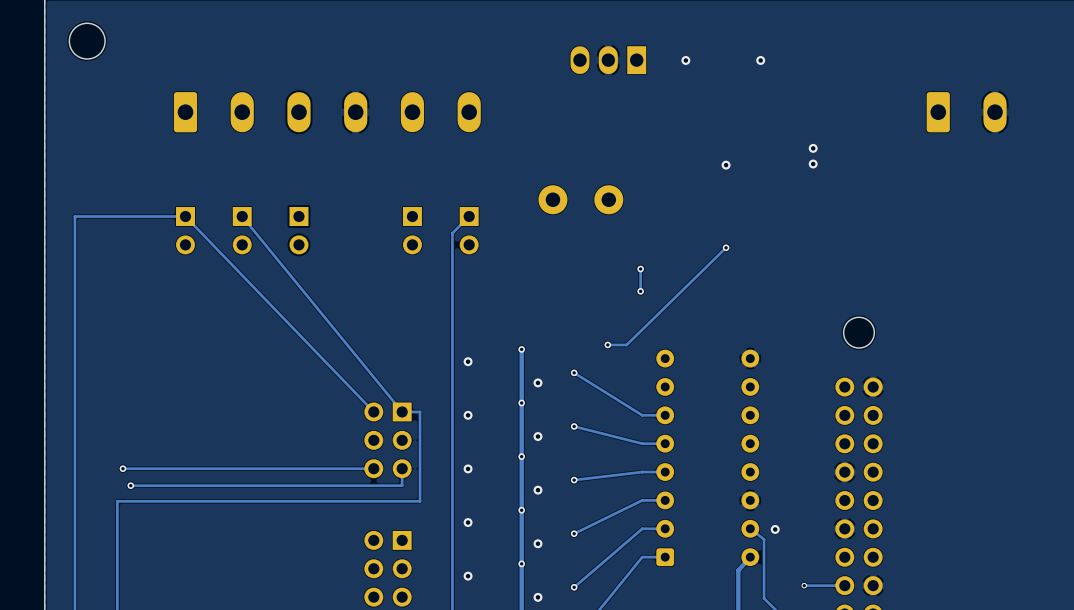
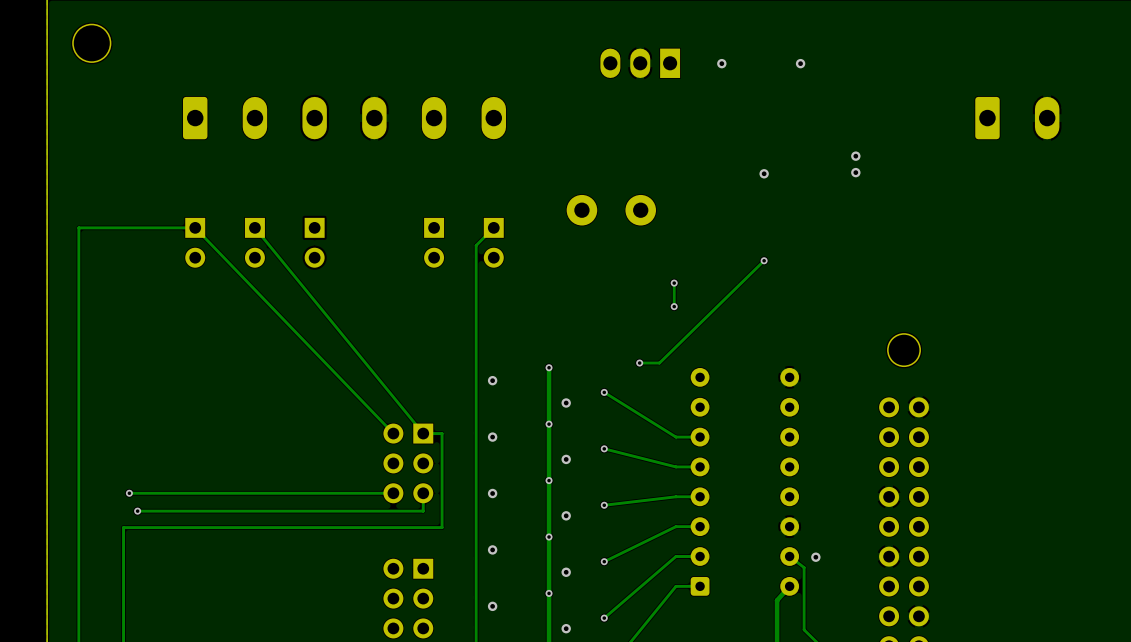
via: (804, 585) -> none
track: (844, 585) (804, 585) -> none

